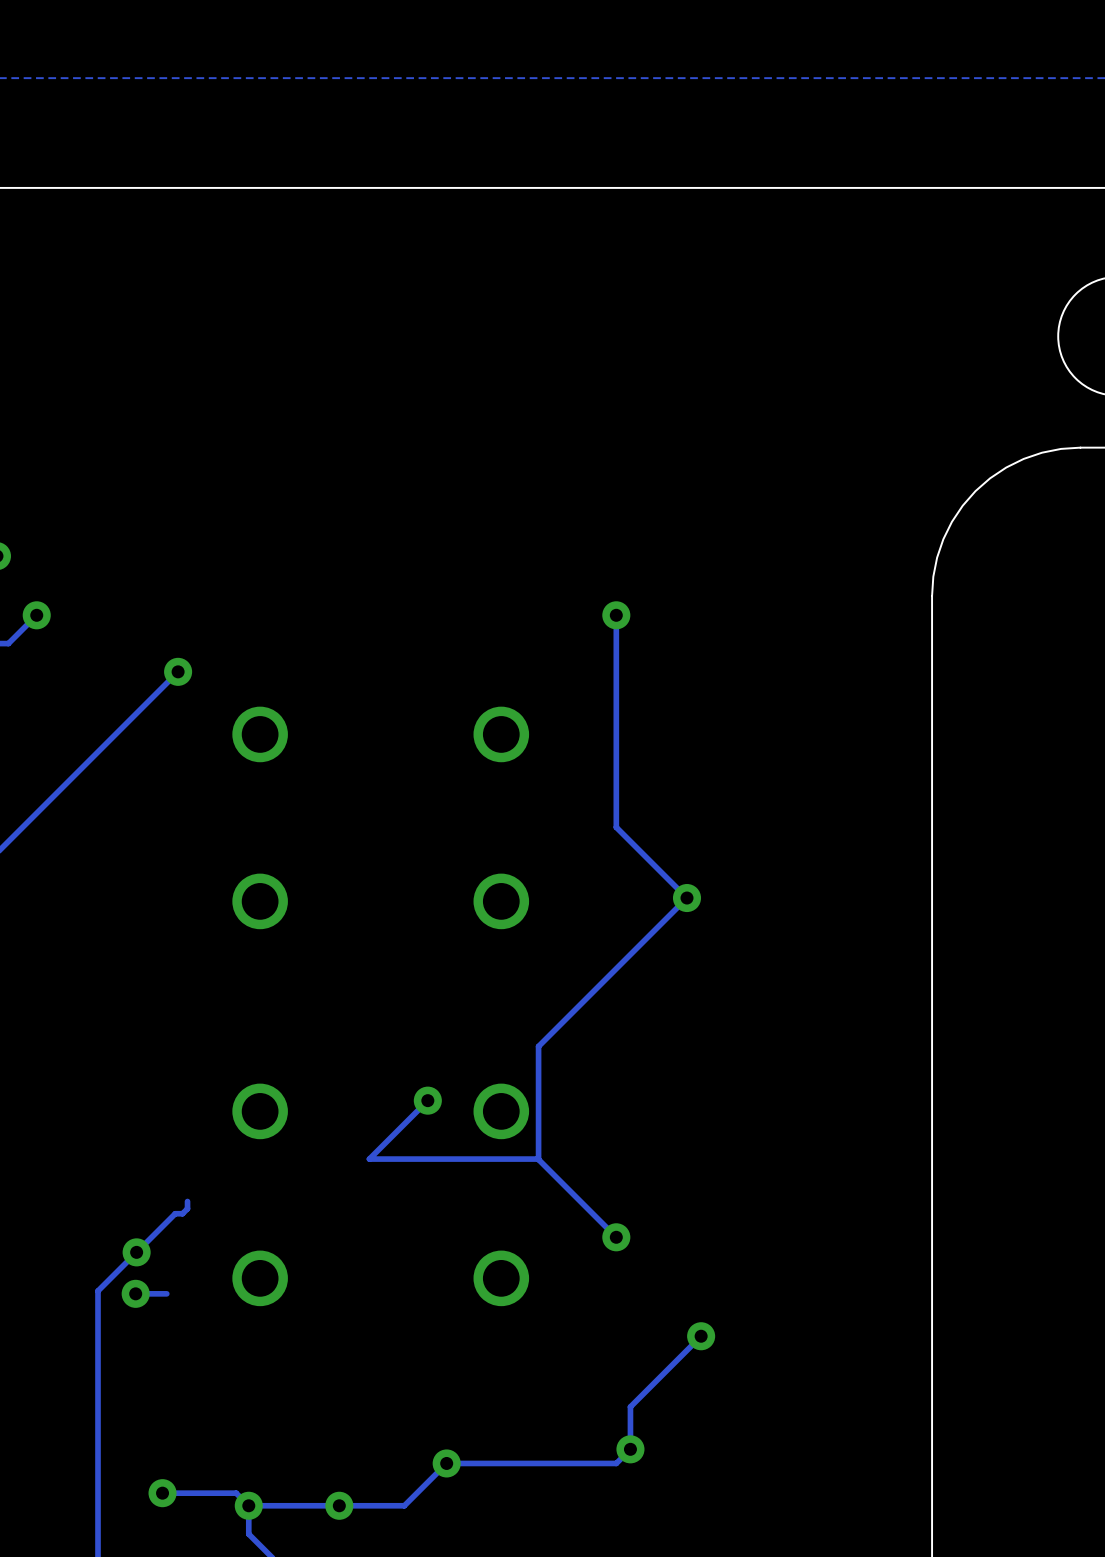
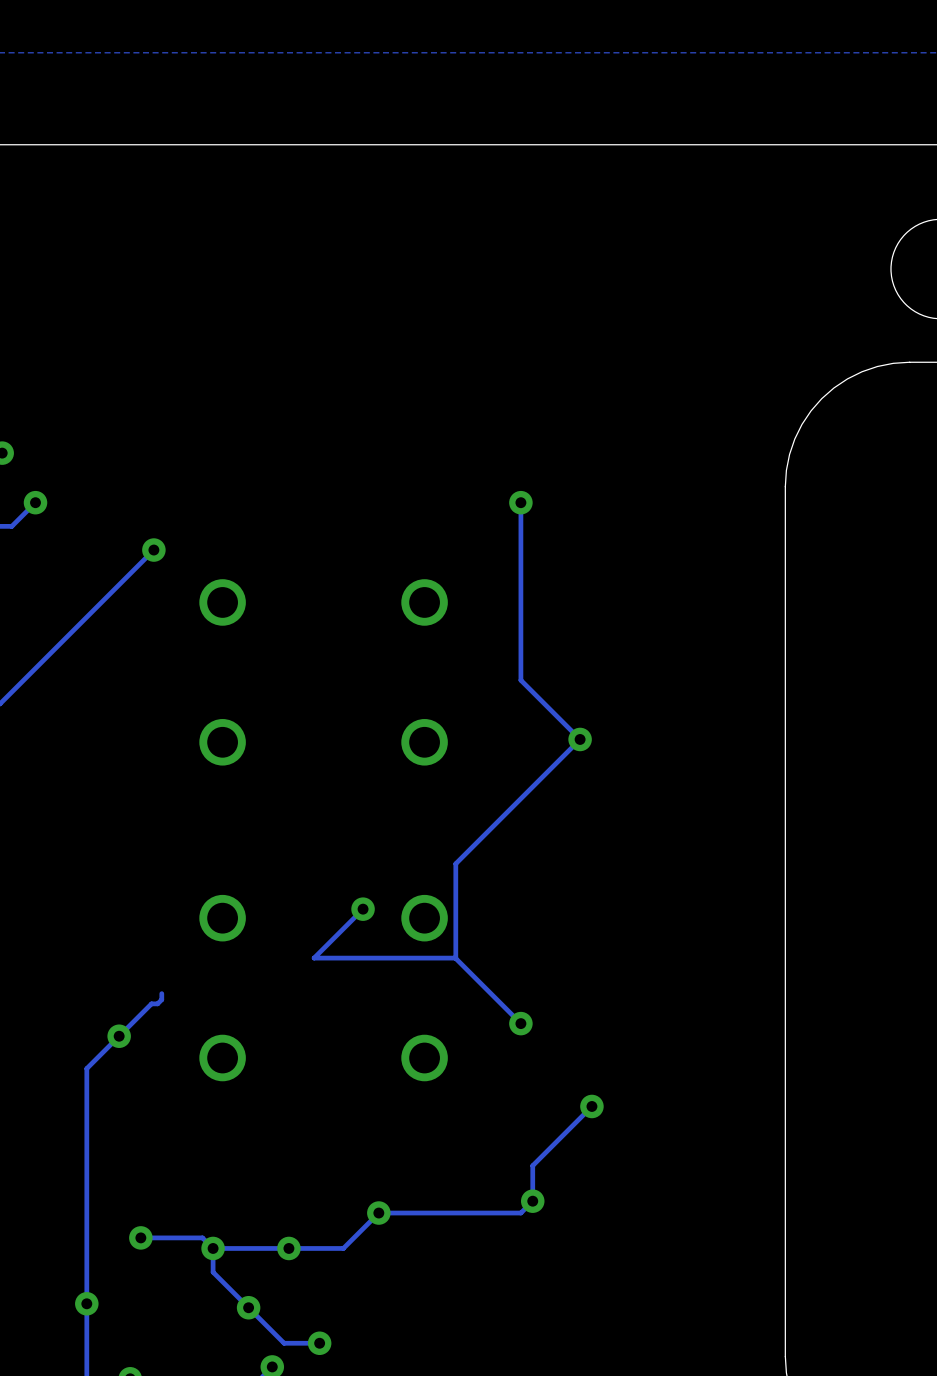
via: (135, 1293) -> none
track: (166, 1293) (135, 1293) -> none

